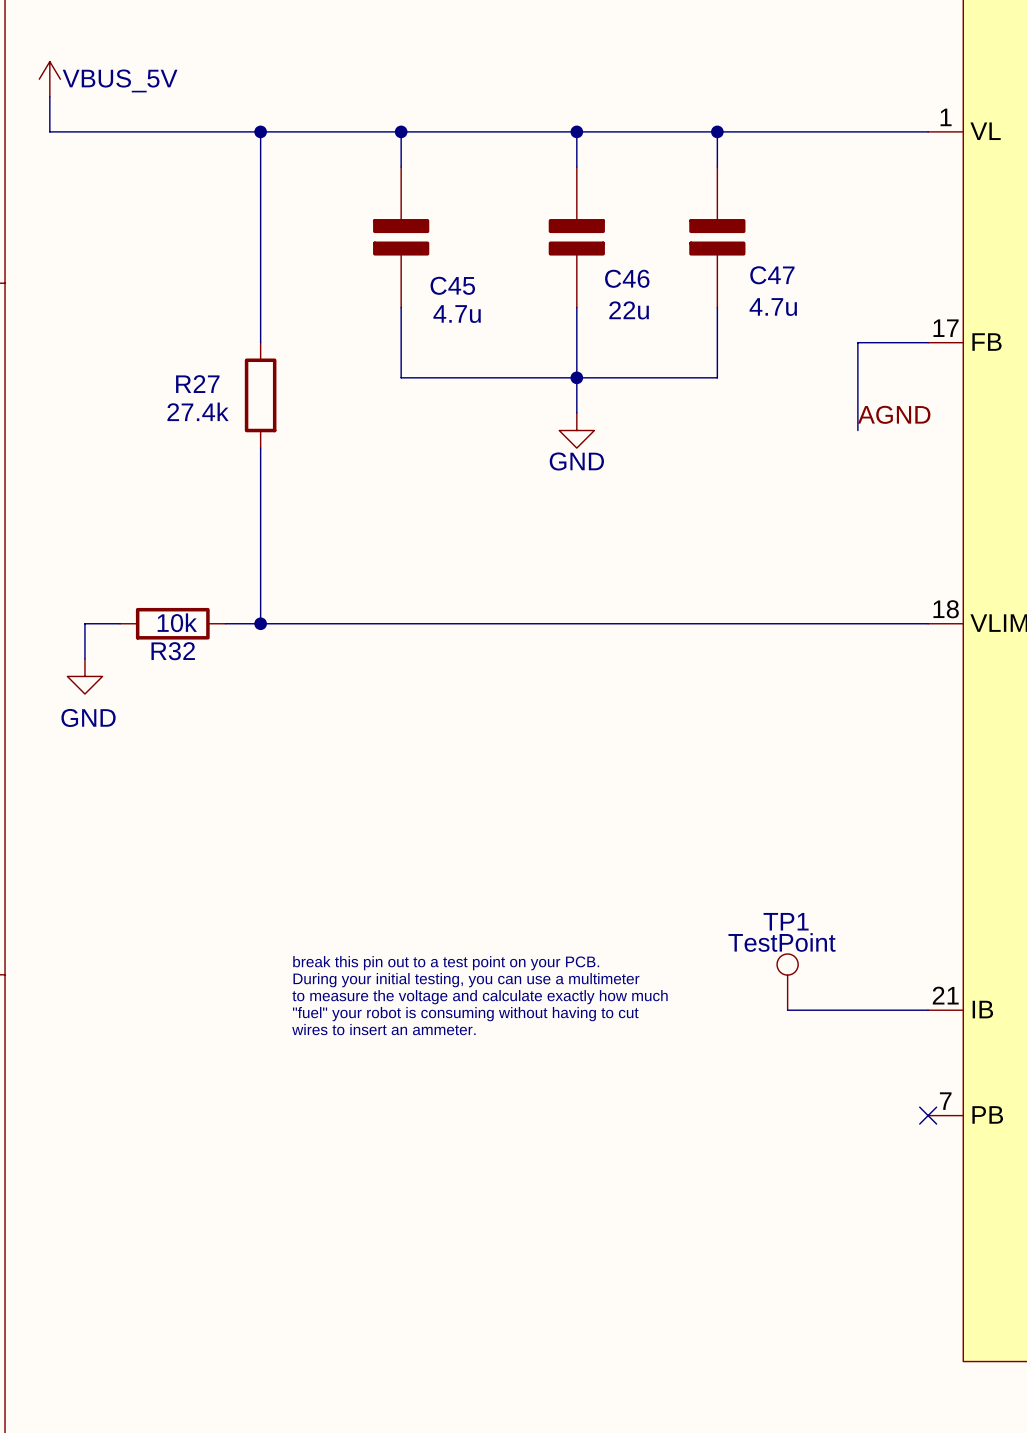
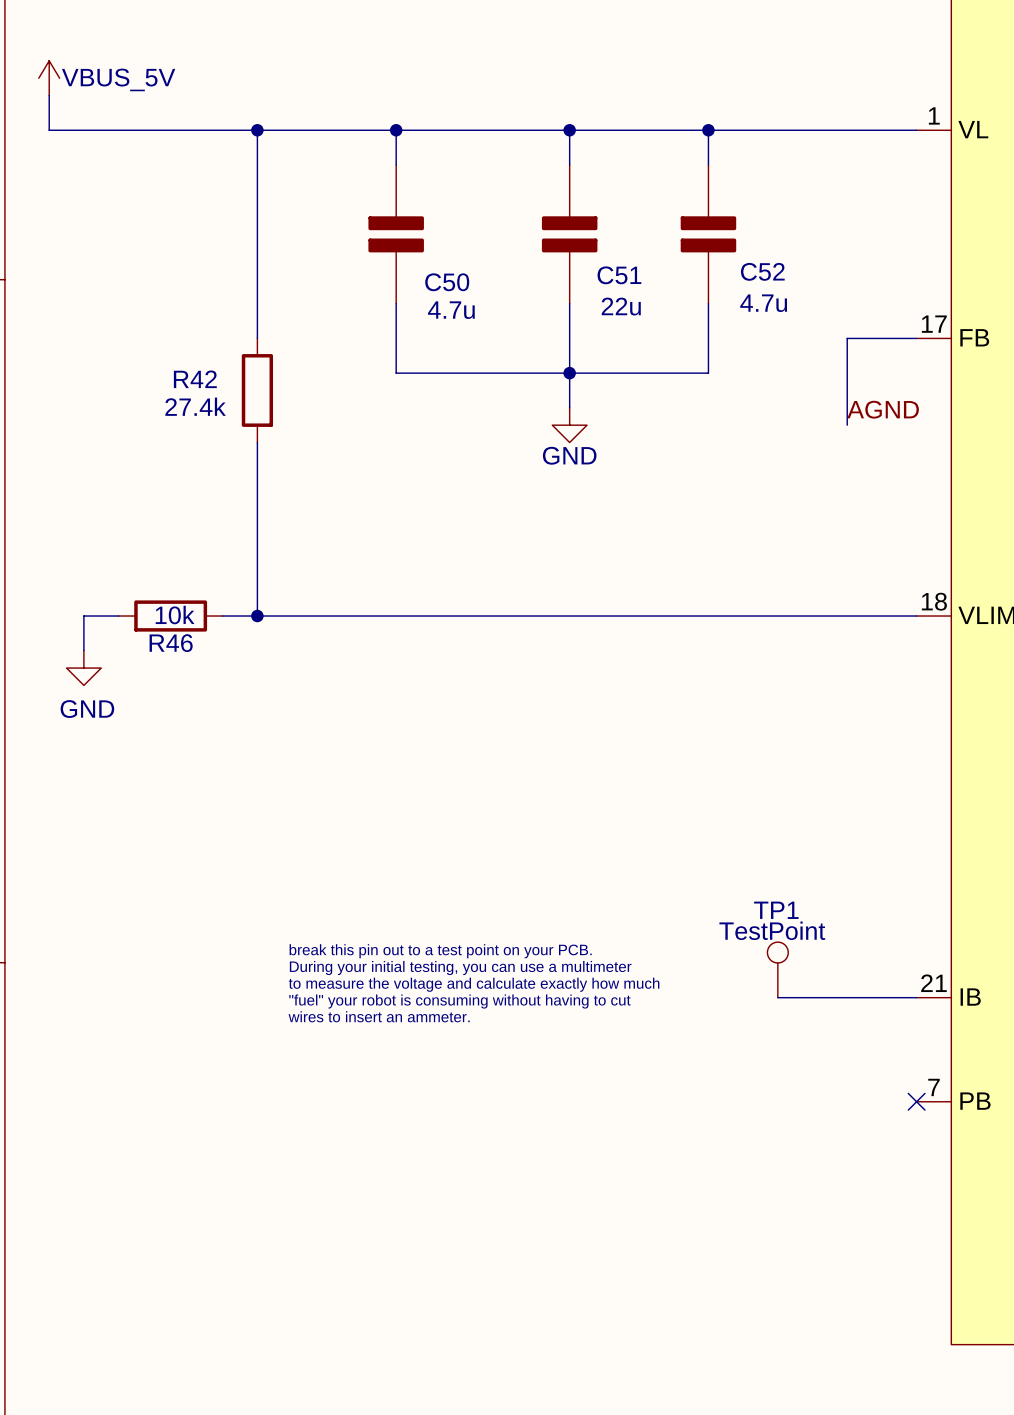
C47 name: C47 (772, 275) -> C52 (762, 271)
C46 name: C46 (627, 278) -> C51 (619, 275)
C45 name: C45 (452, 285) -> C50 (447, 282)
R27 name: R27 (197, 384) -> R42 (195, 379)
R32 name: R32 (173, 651) -> R46 (171, 643)

